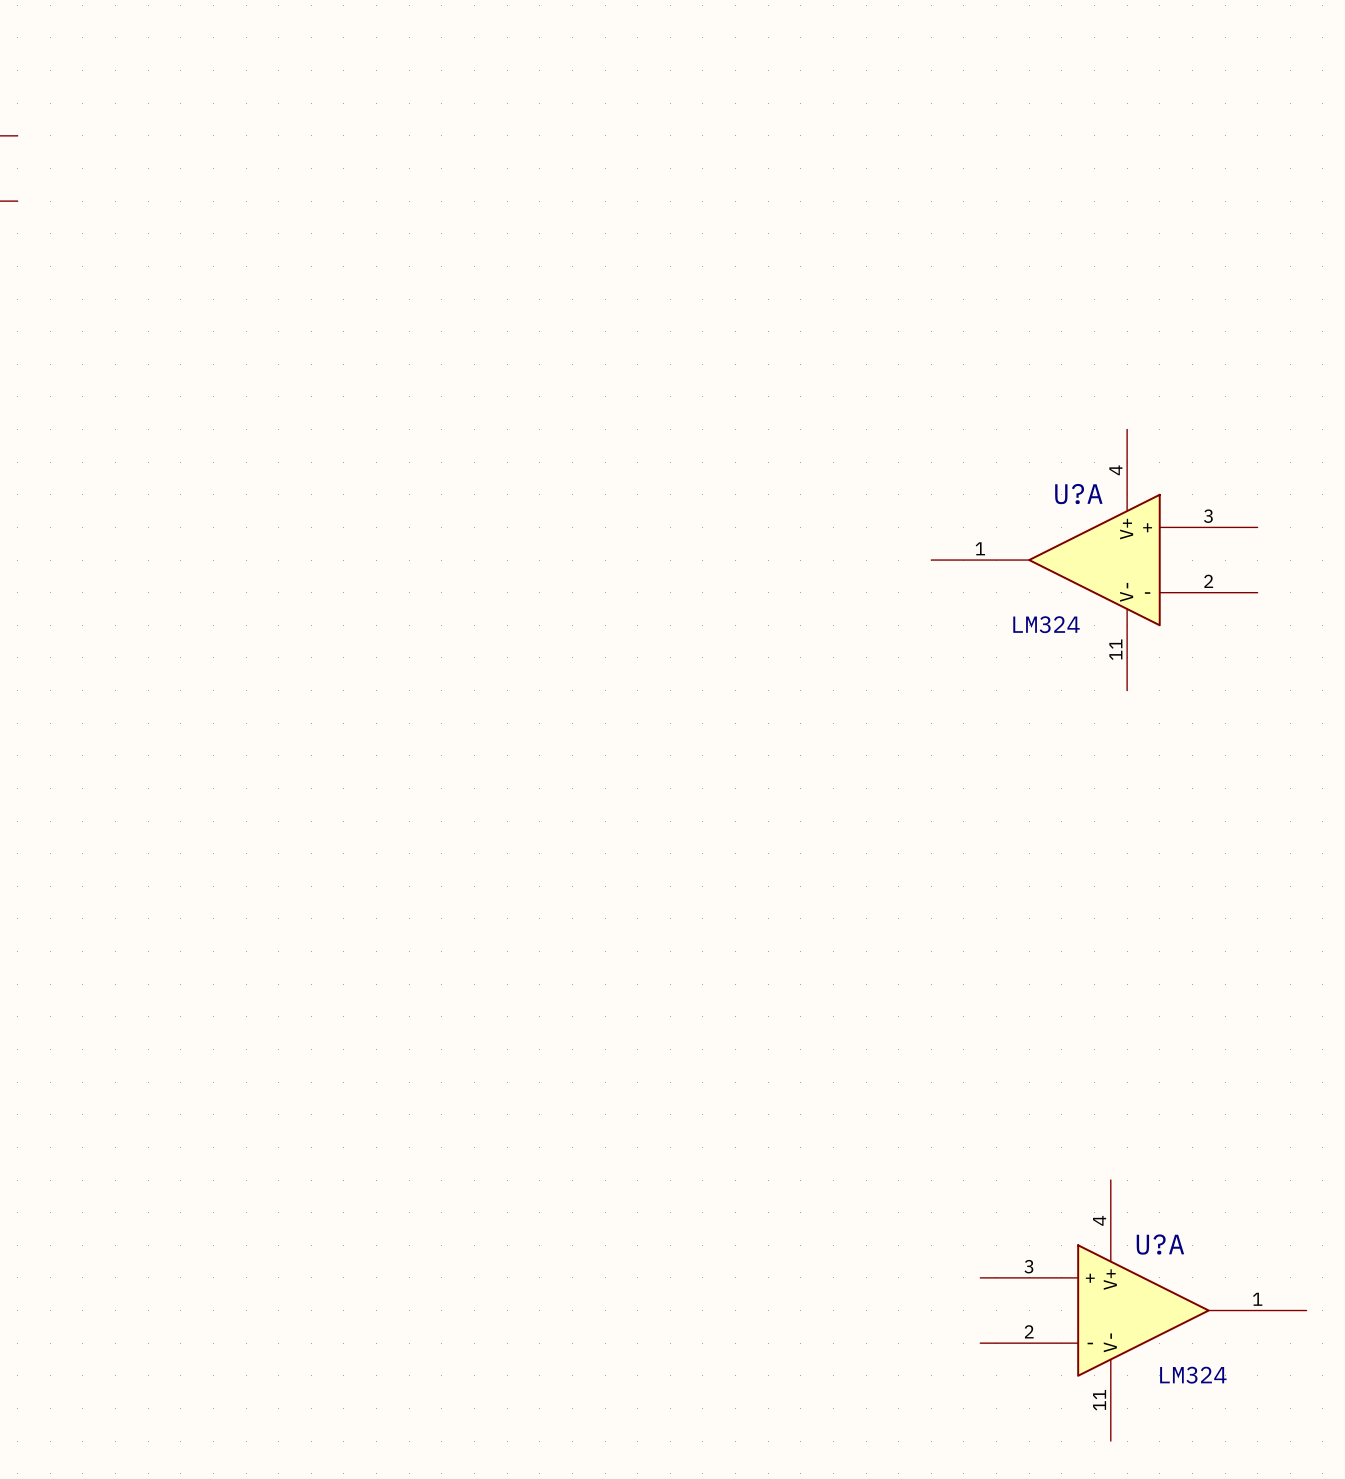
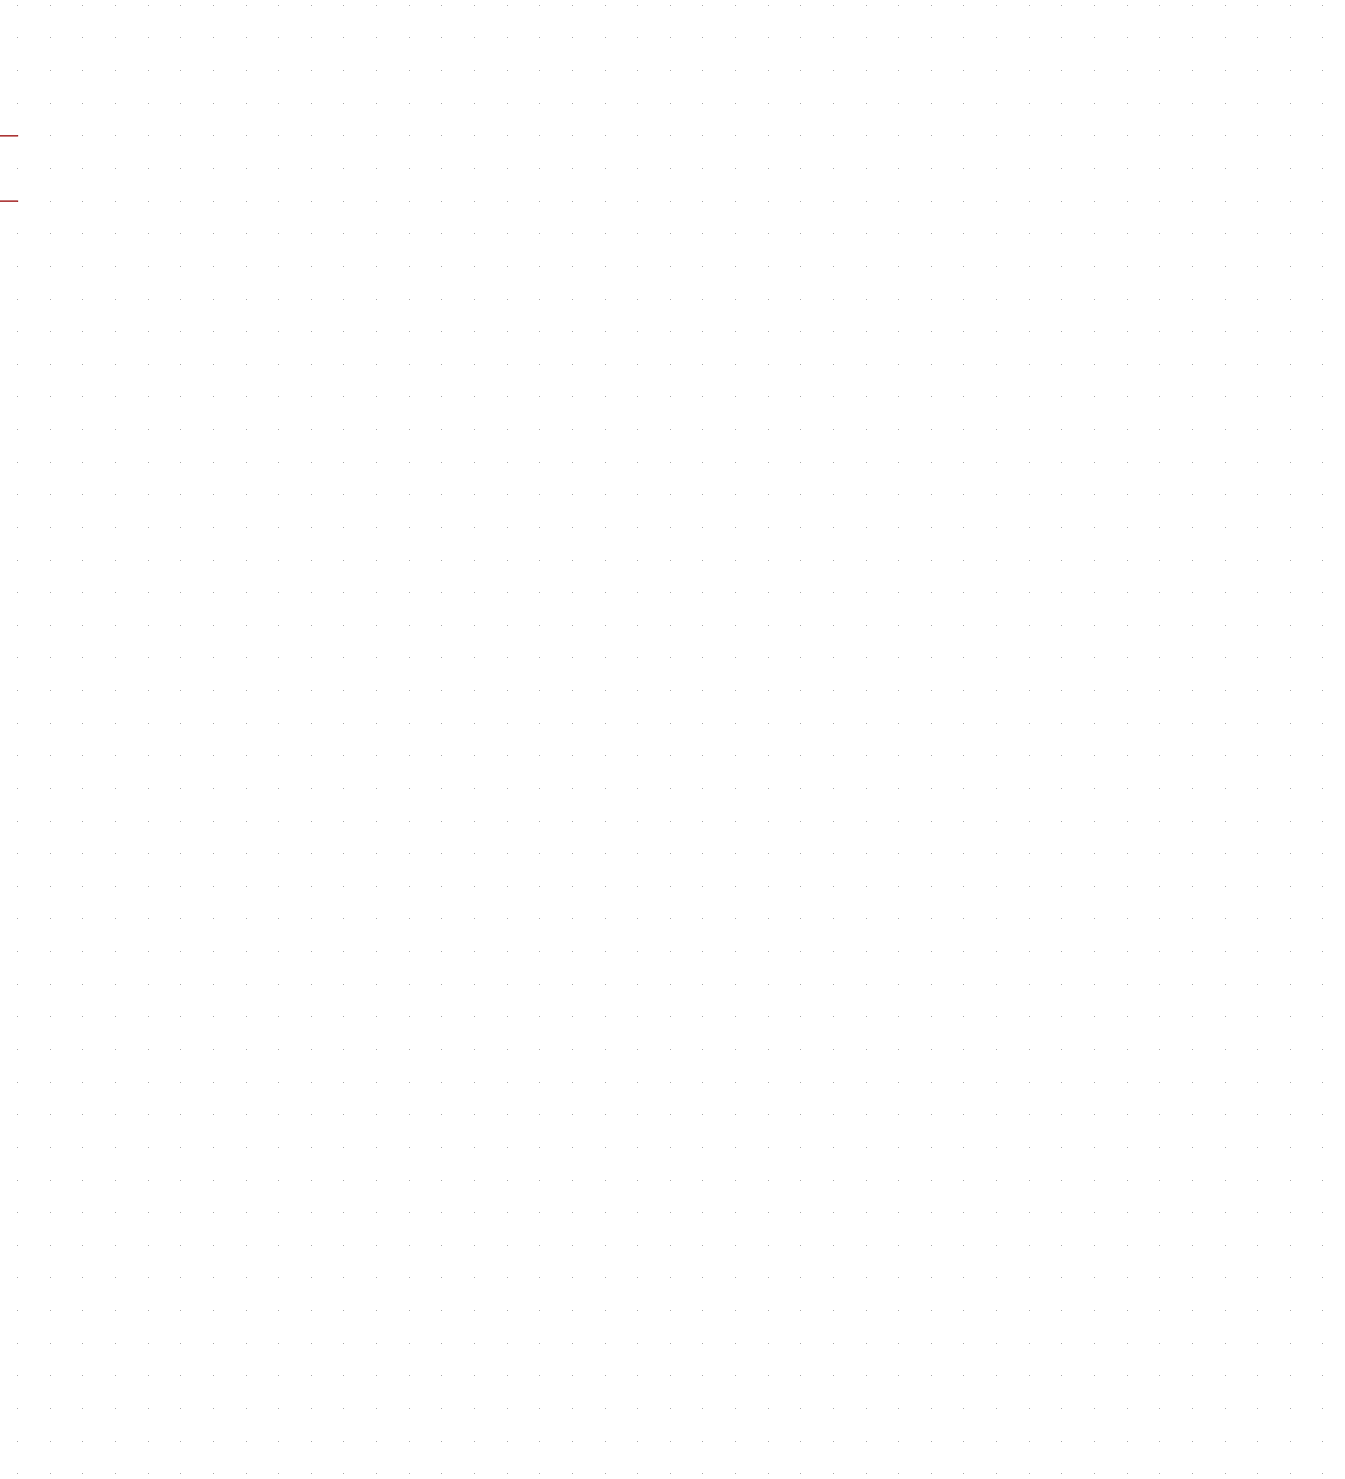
U?A: LM324 (1094, 560) -> none
U?A: LM324 (1143, 1310) -> none

